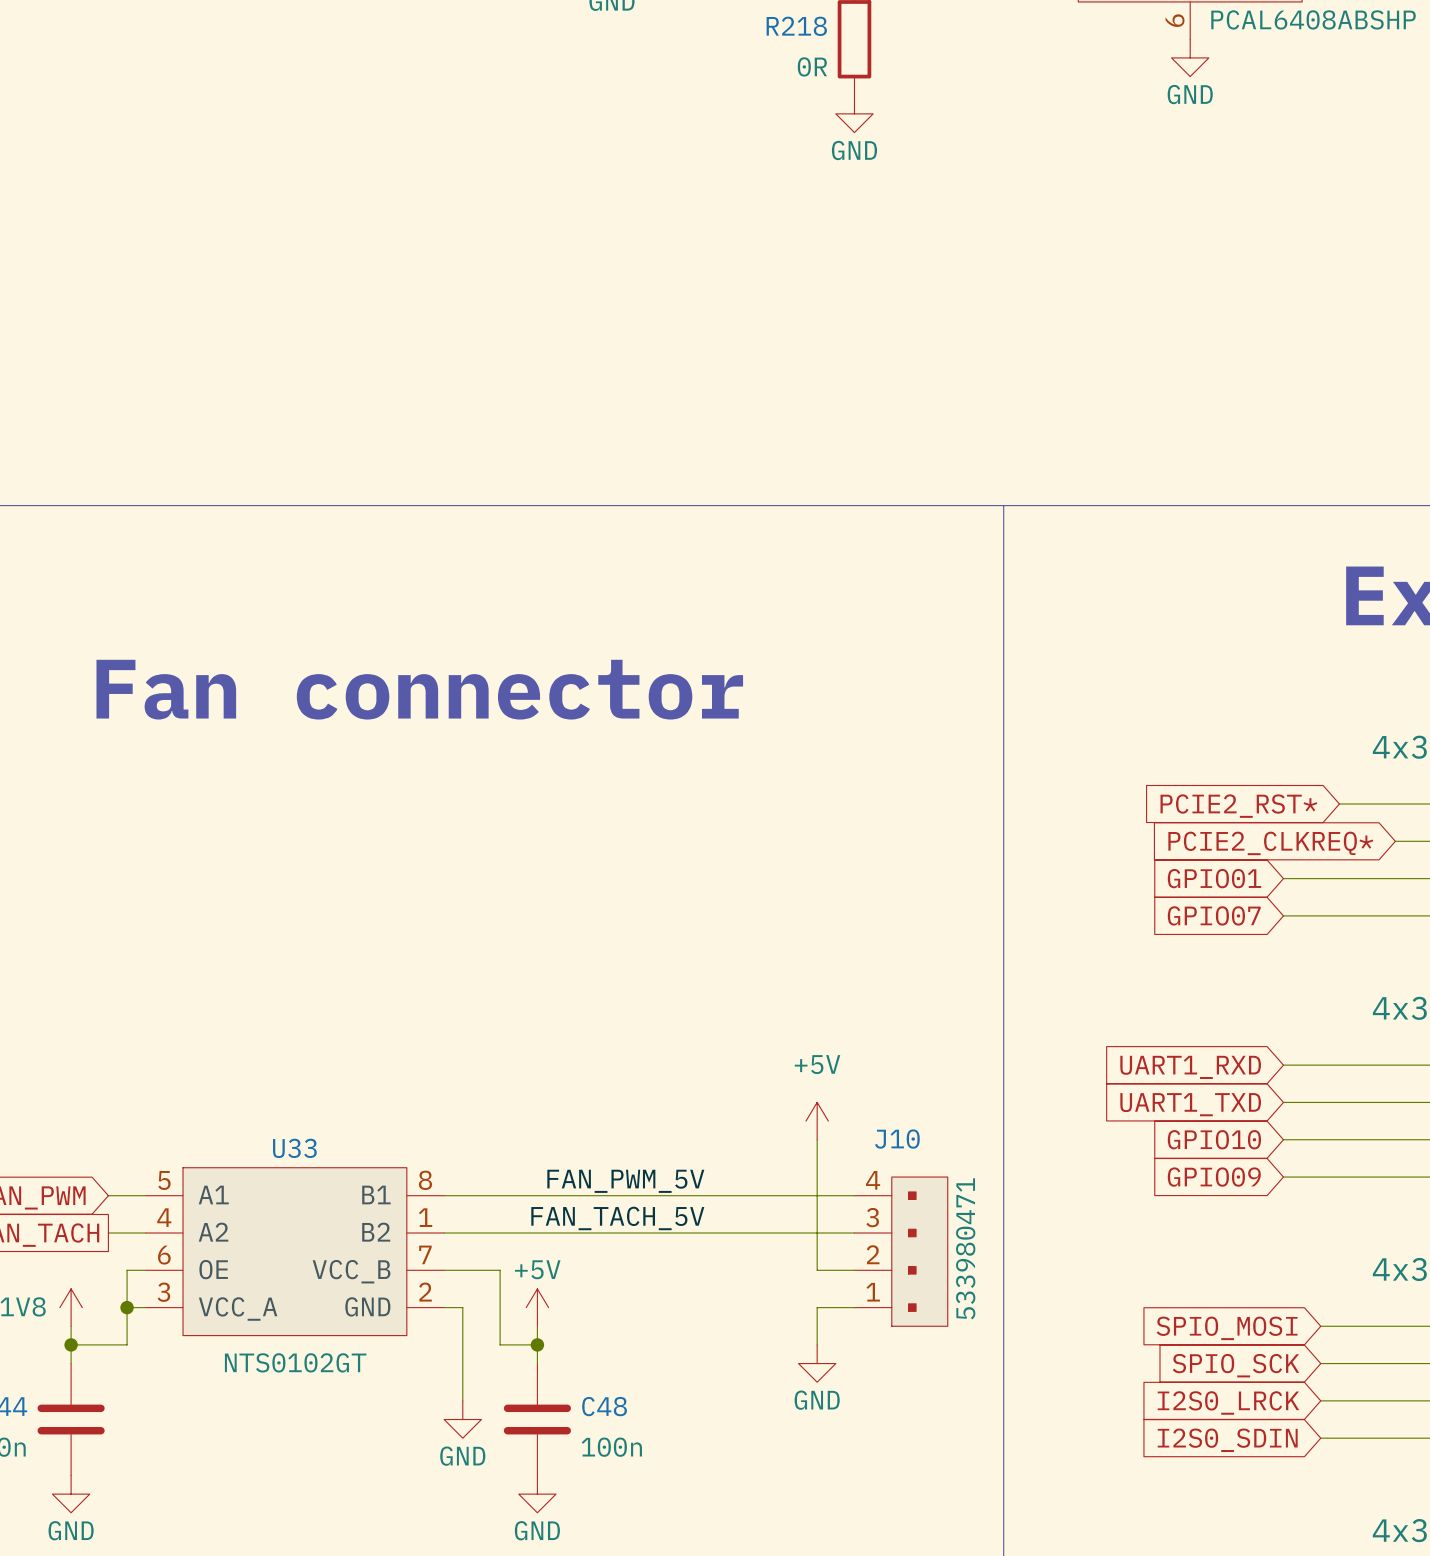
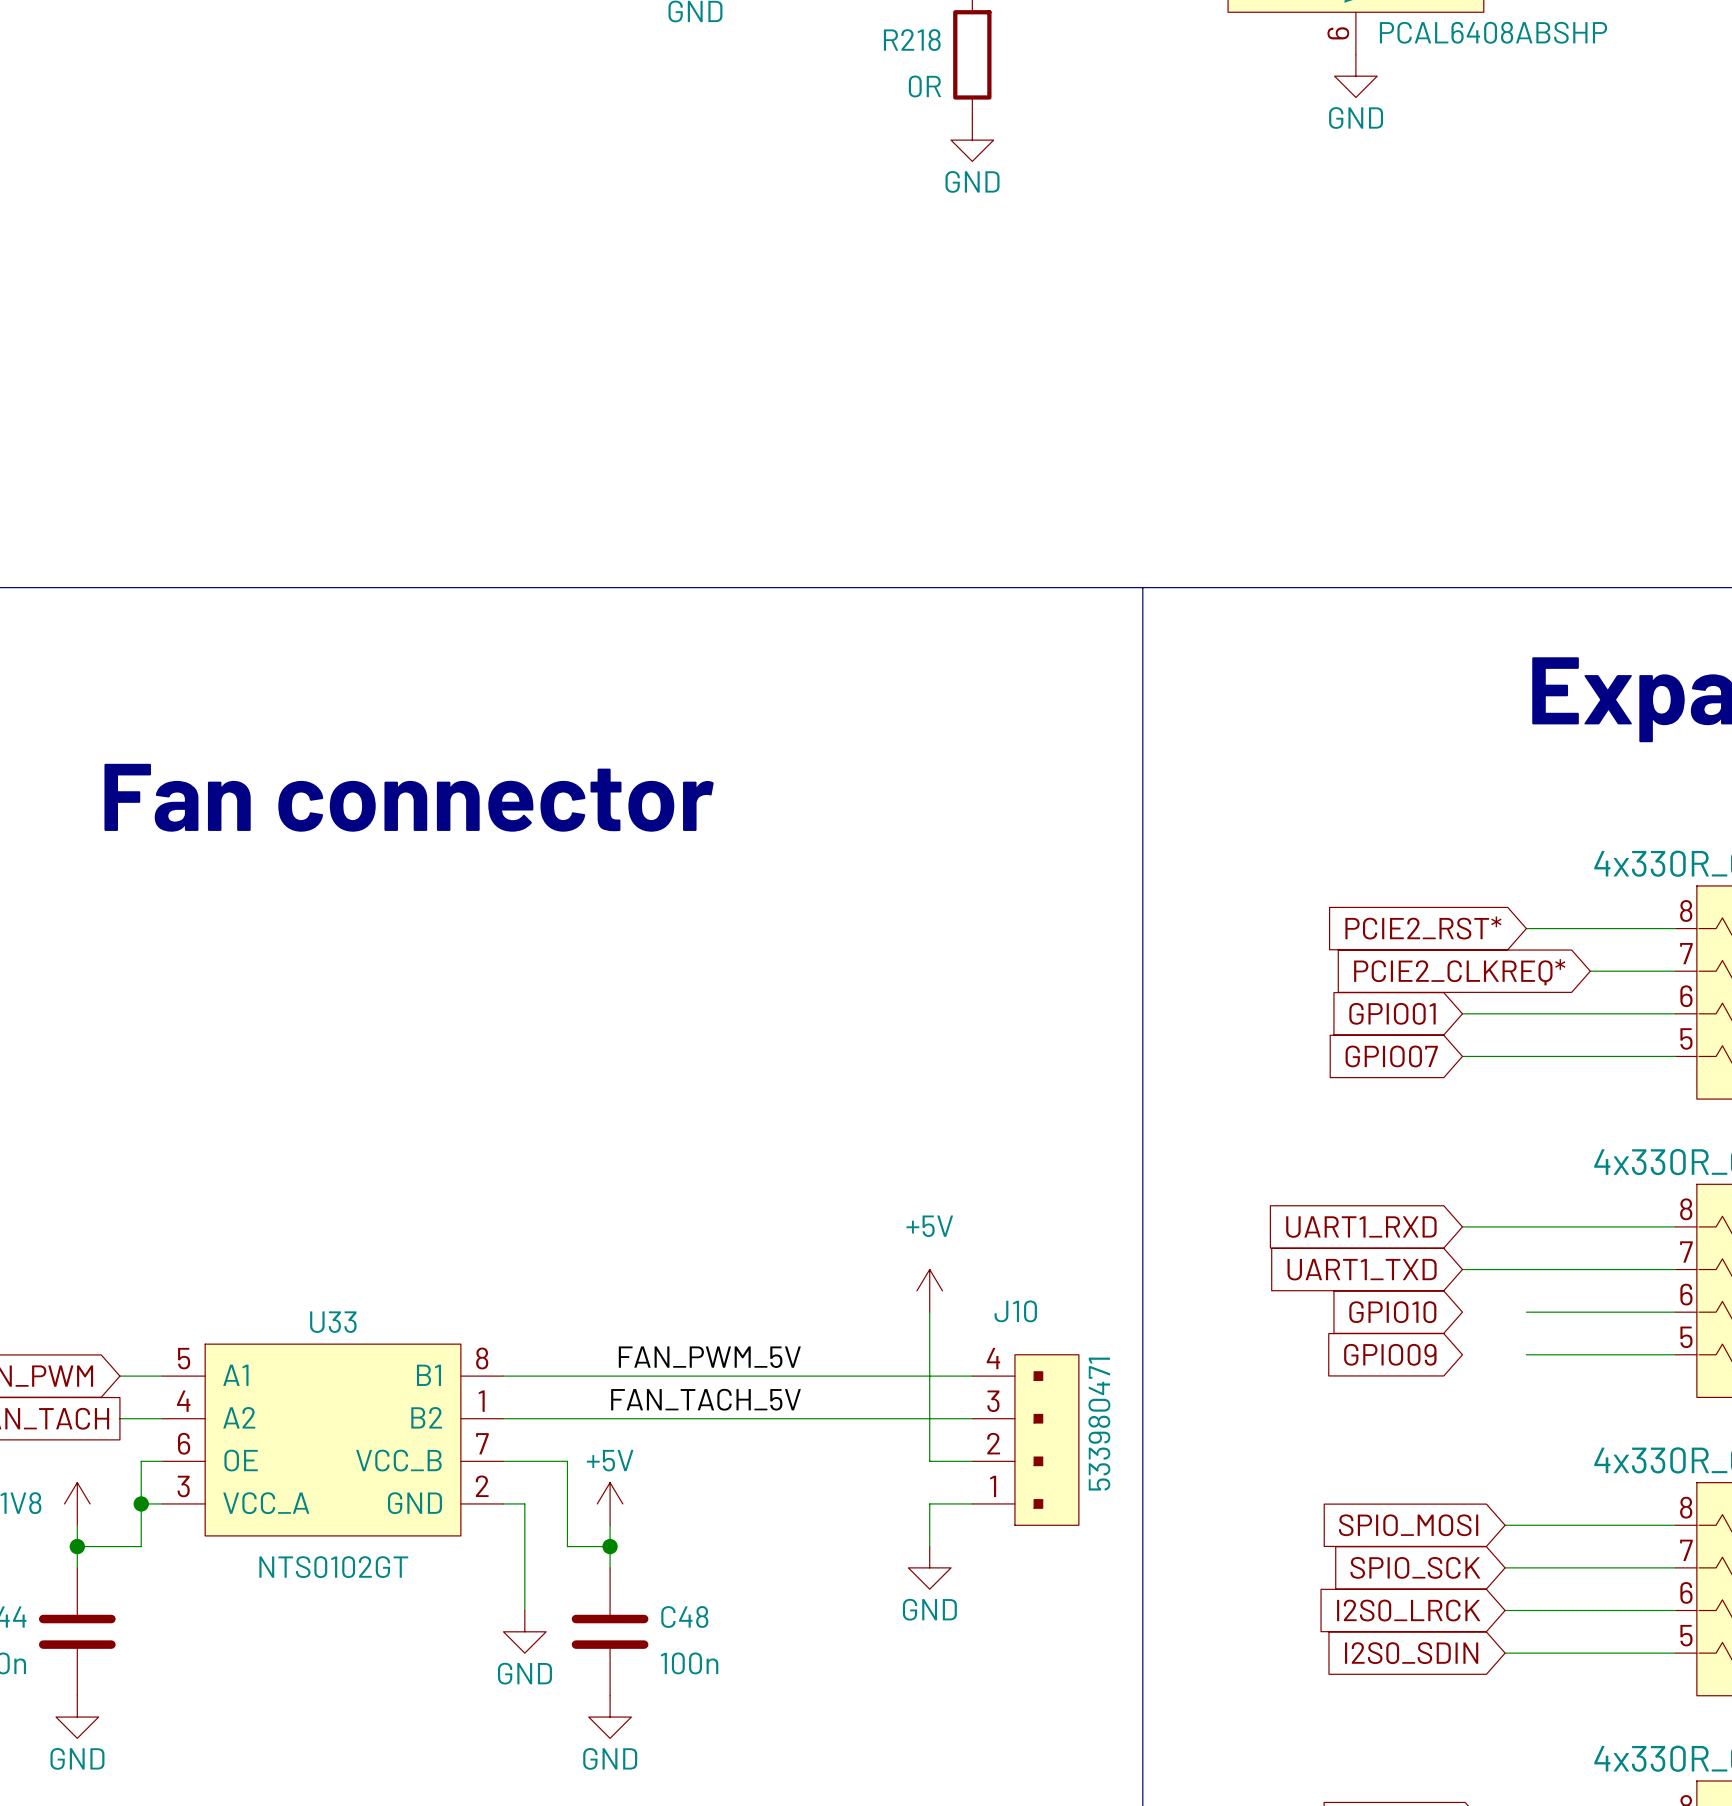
wire: (1283, 1139) (1339, 1139) -> none
wire: (1283, 1177) (1339, 1177) -> none

